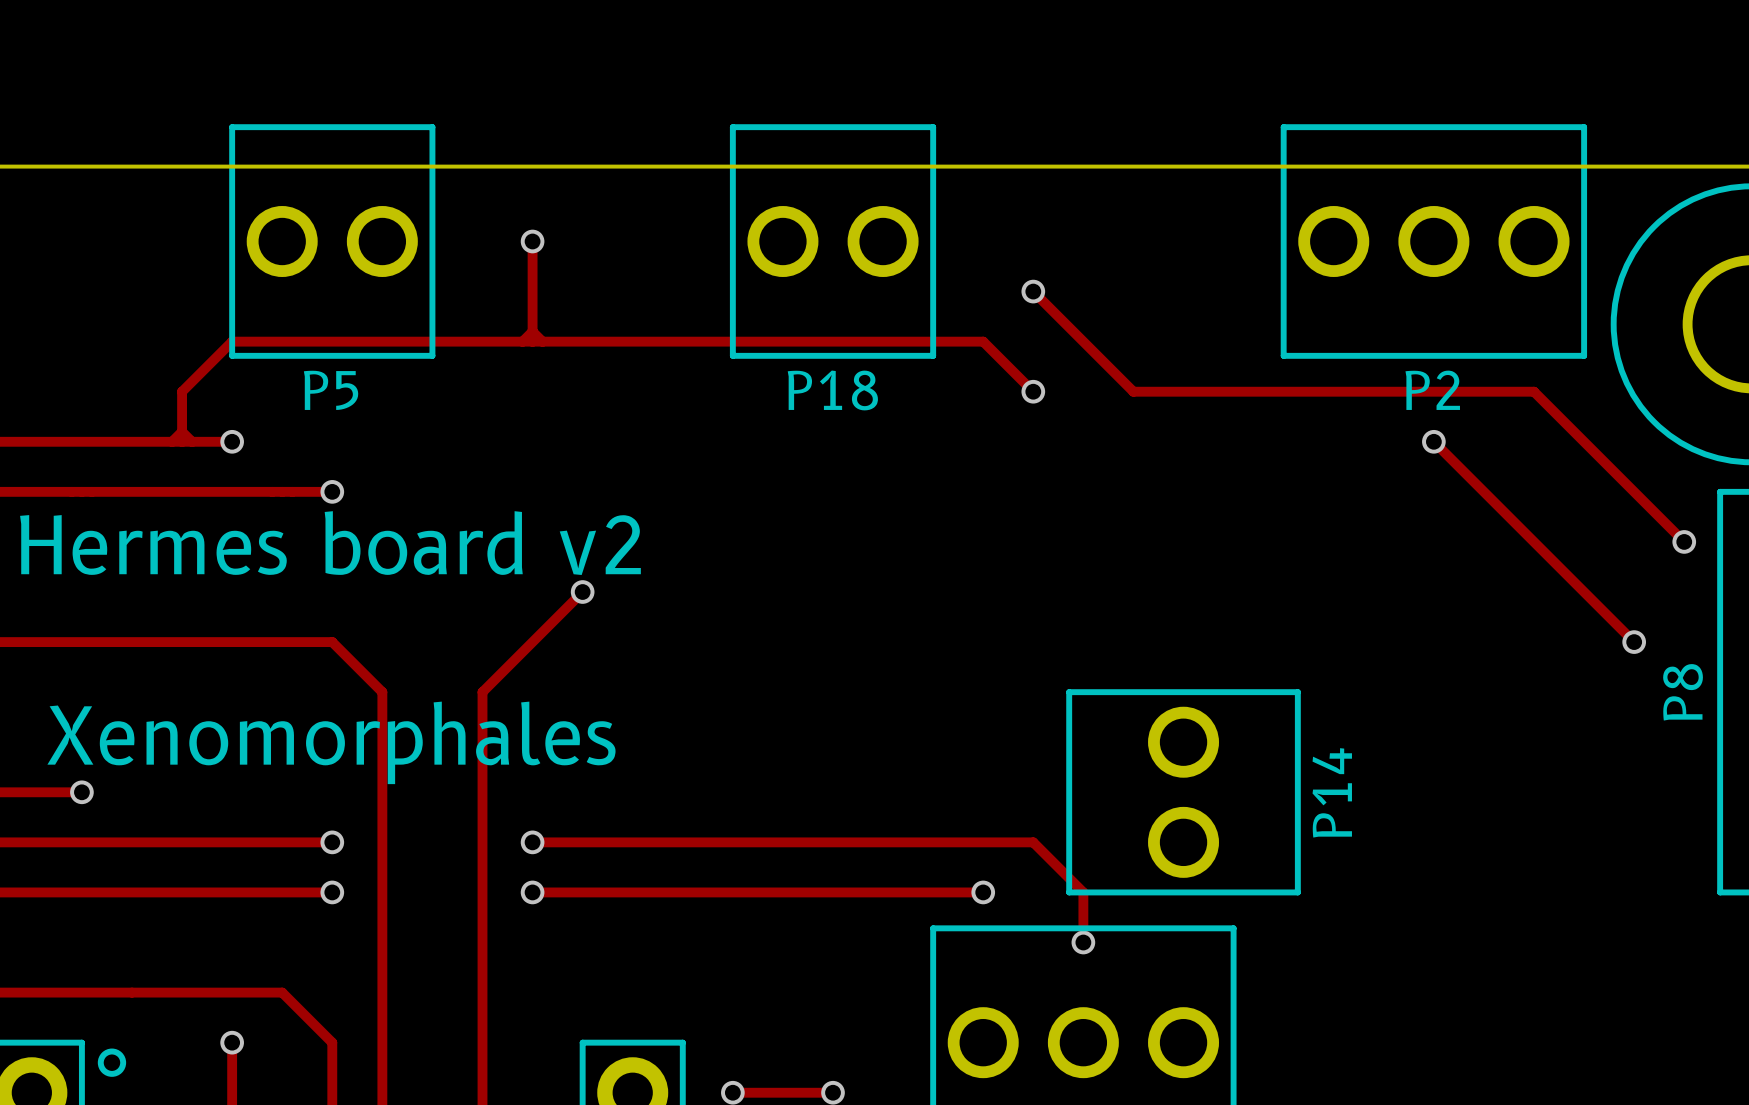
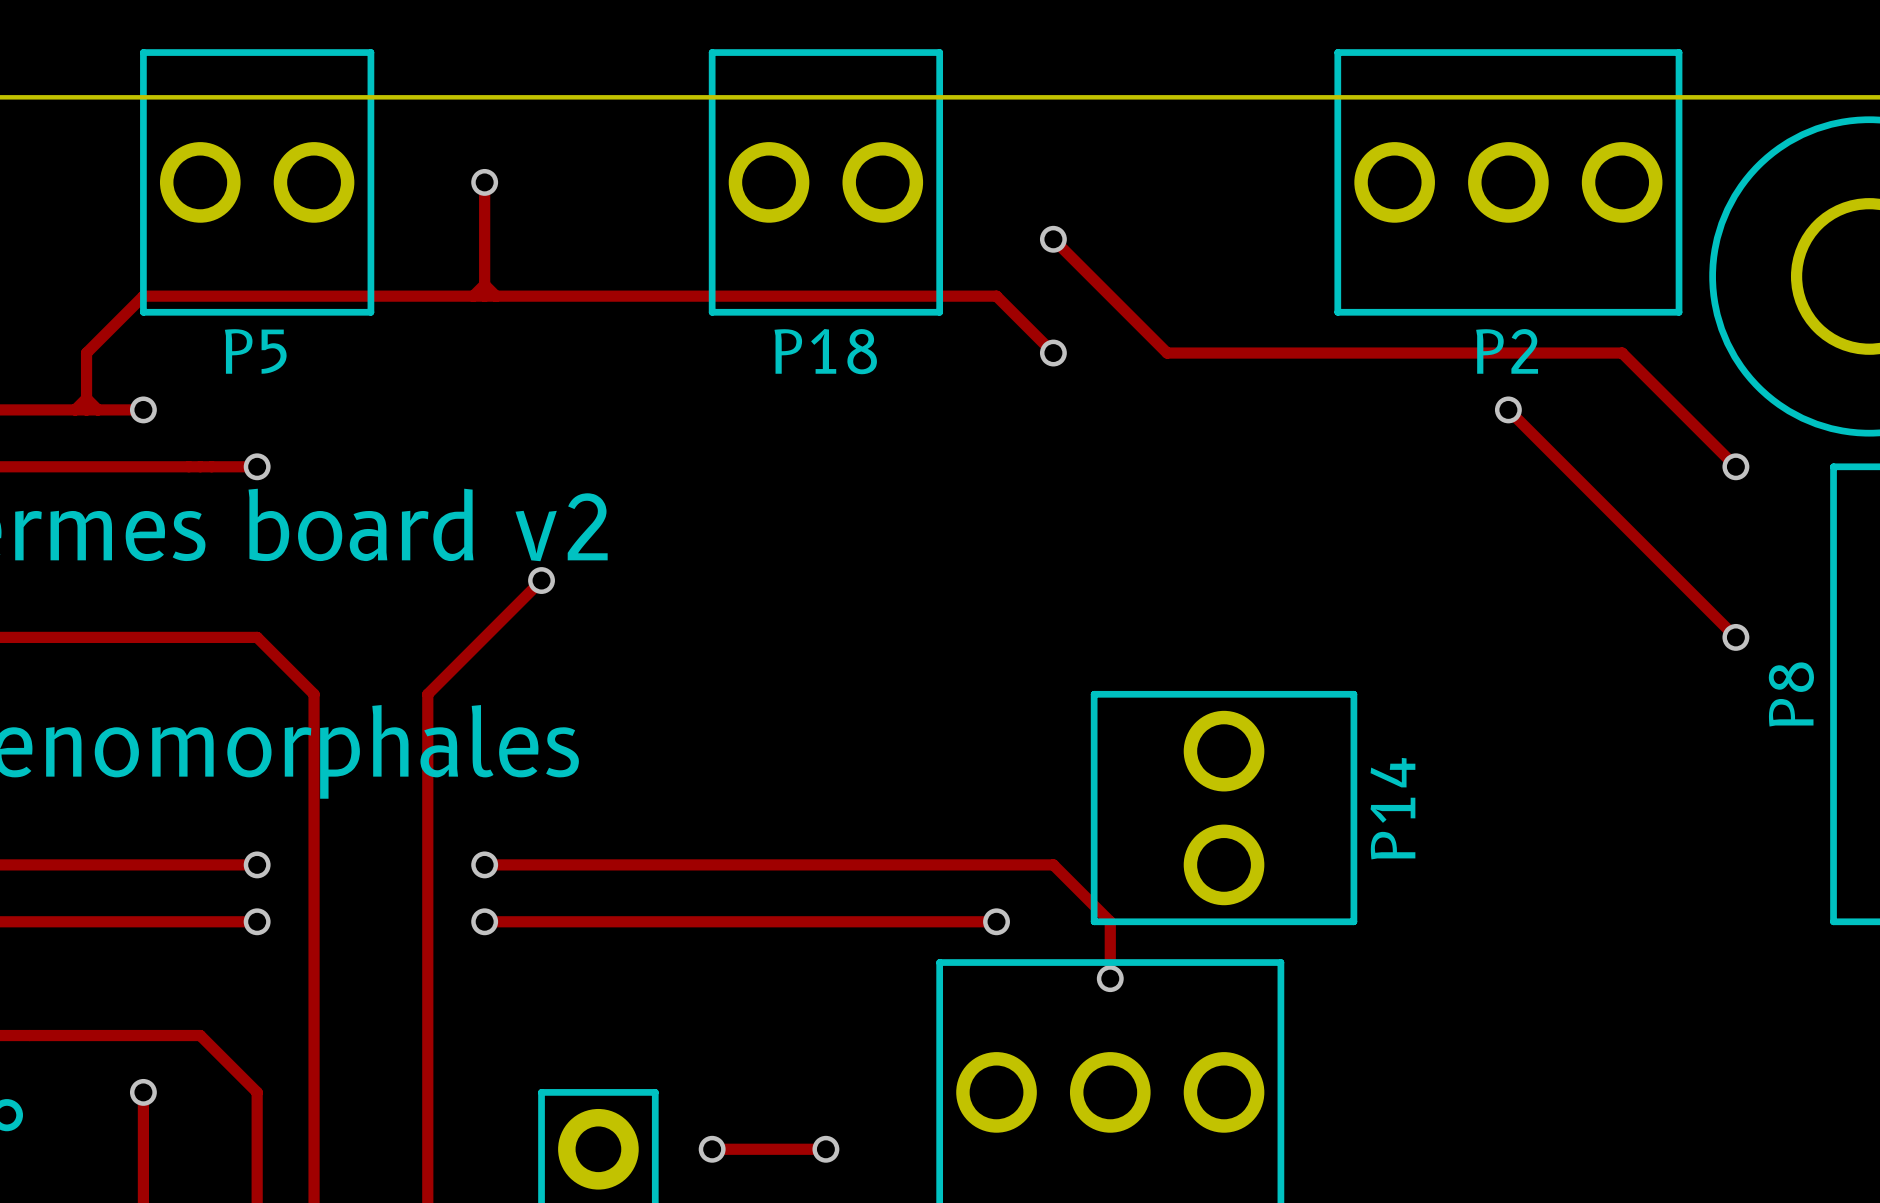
track: (1634, 491) (1684, 541) -> none
via position: (1684, 541) -> (1735, 466)

